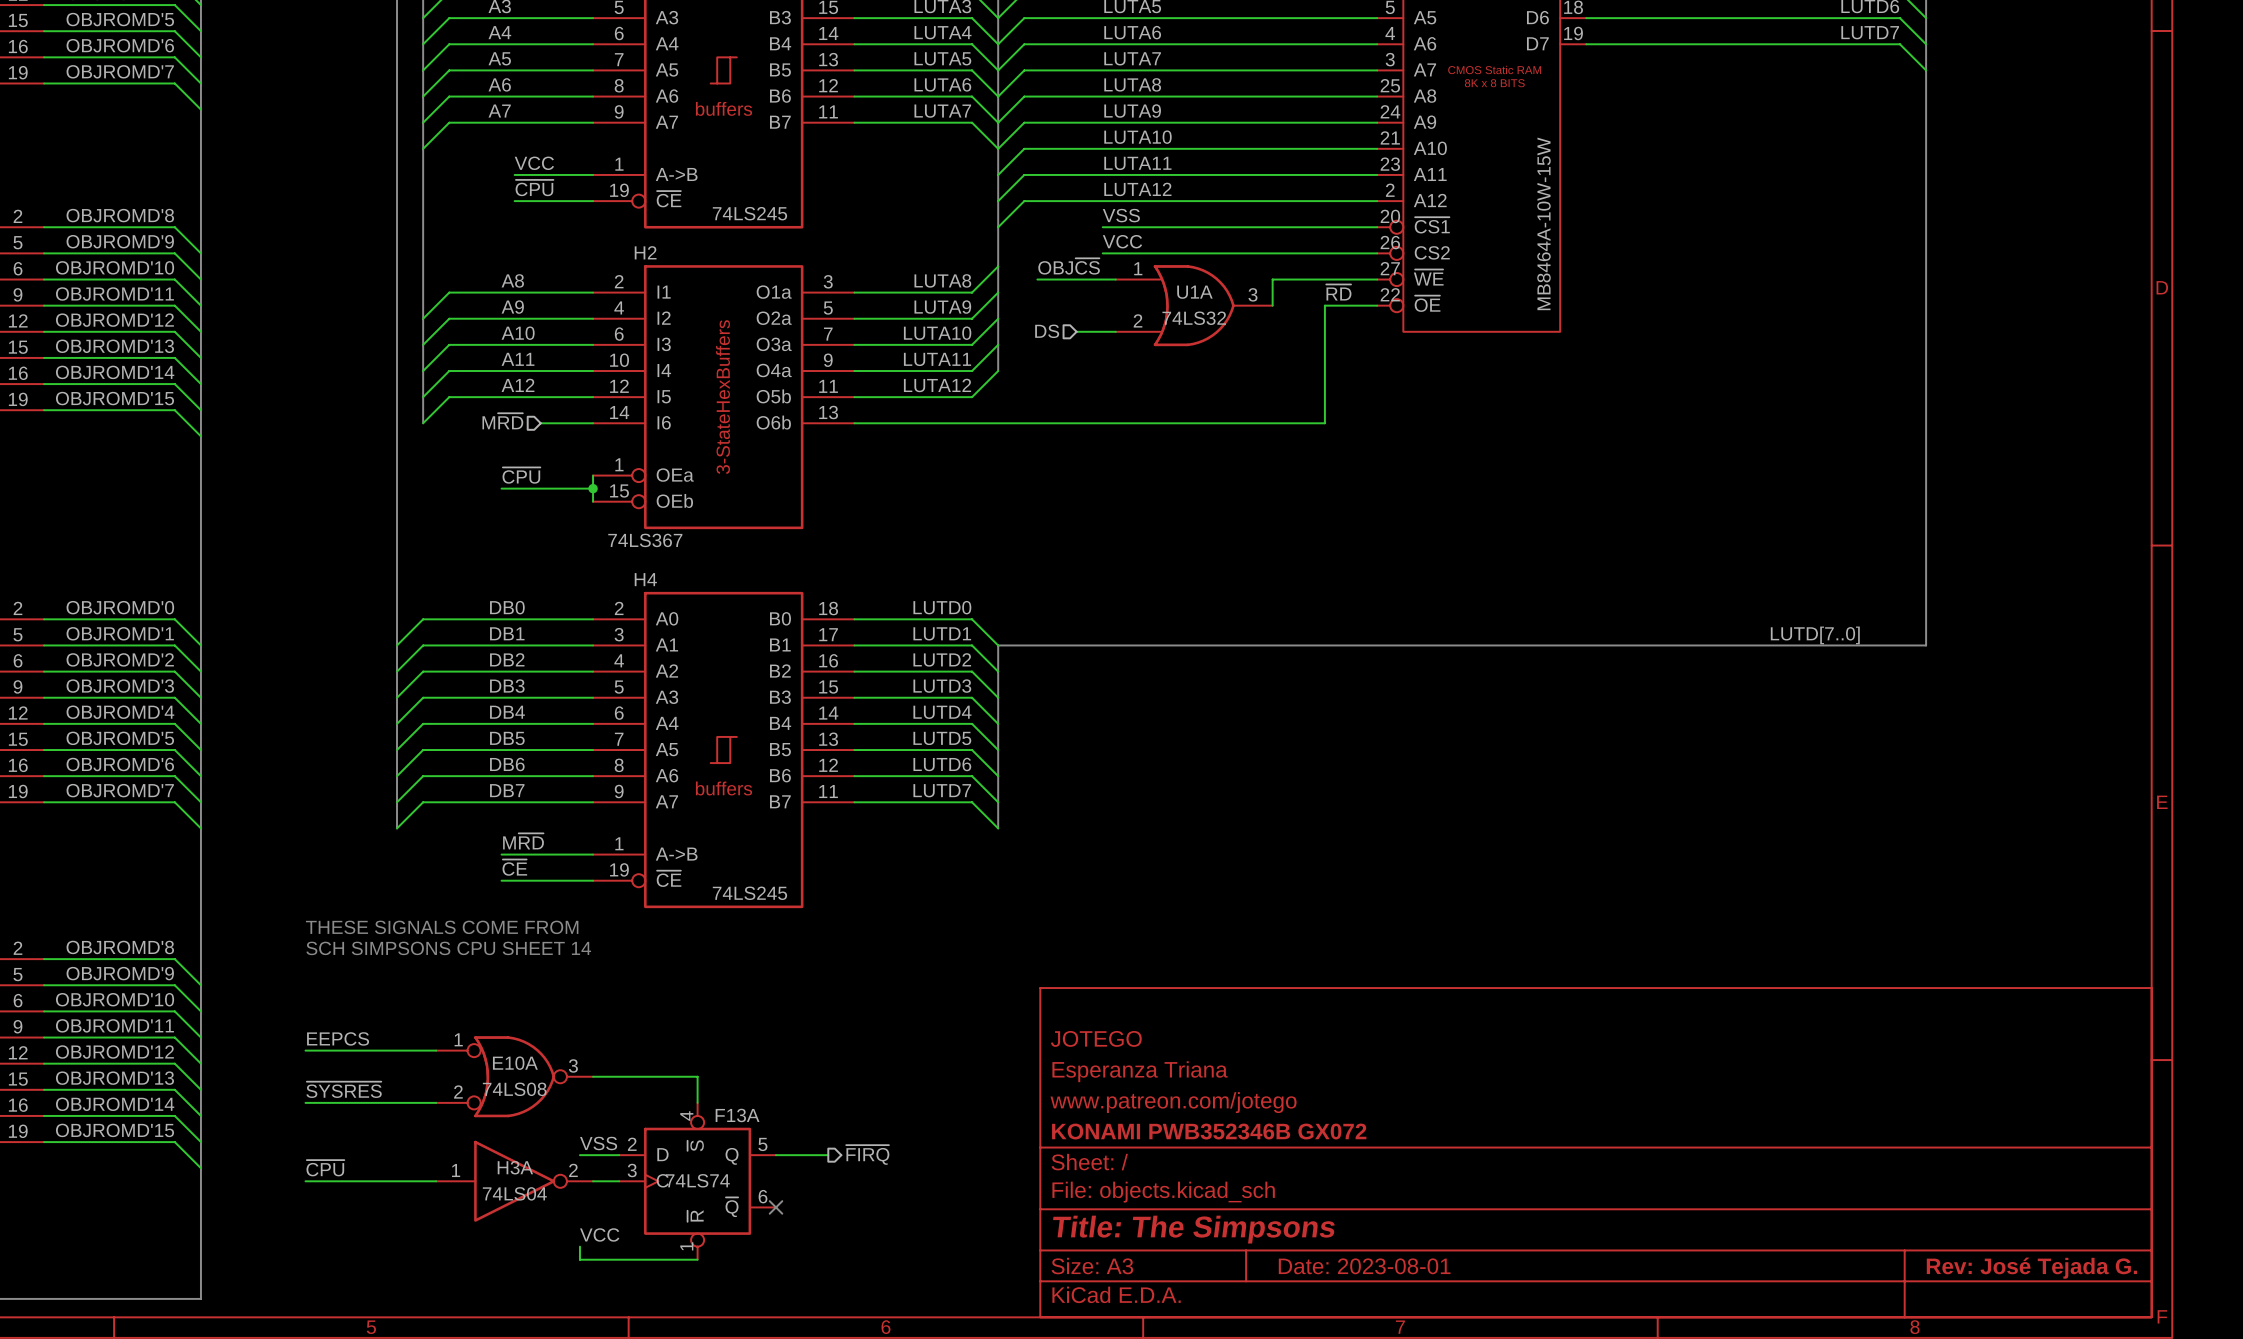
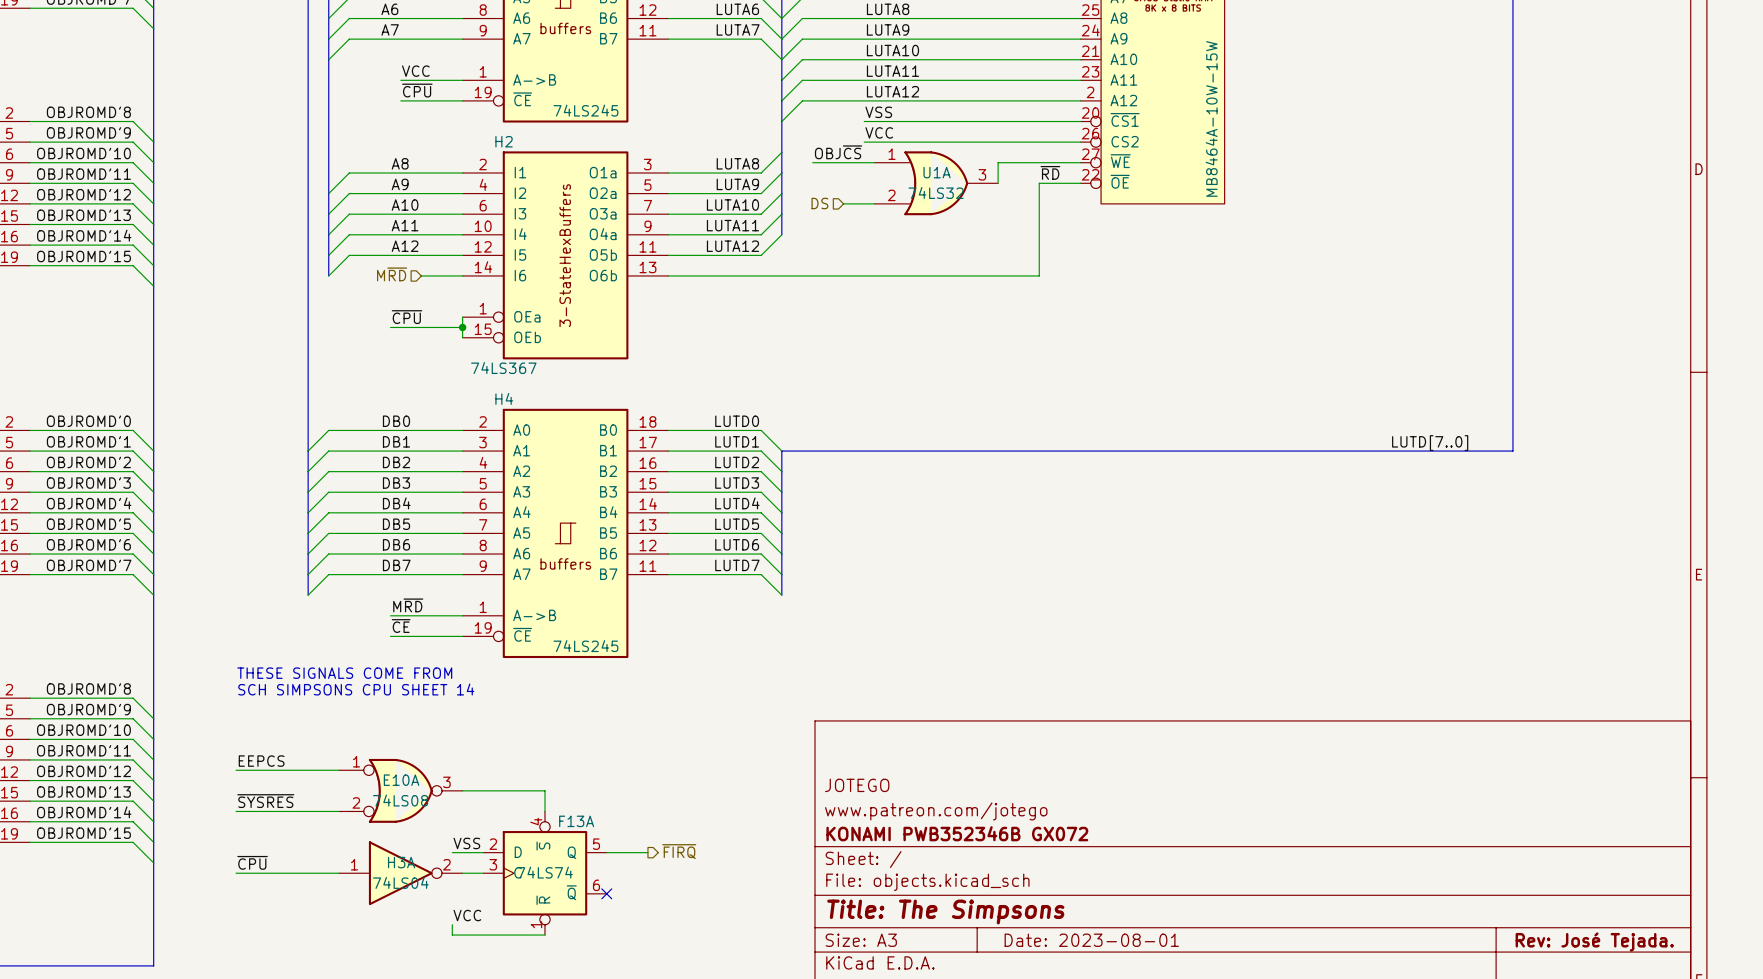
title block: JOTEGO (1096, 1038) -> none
title block: Esperanza Triana (1140, 1071) -> JOTEGO (857, 785)
title block: Rev: José Tejada G. (2031, 1268) -> Rev: José Tejada. (1594, 941)

